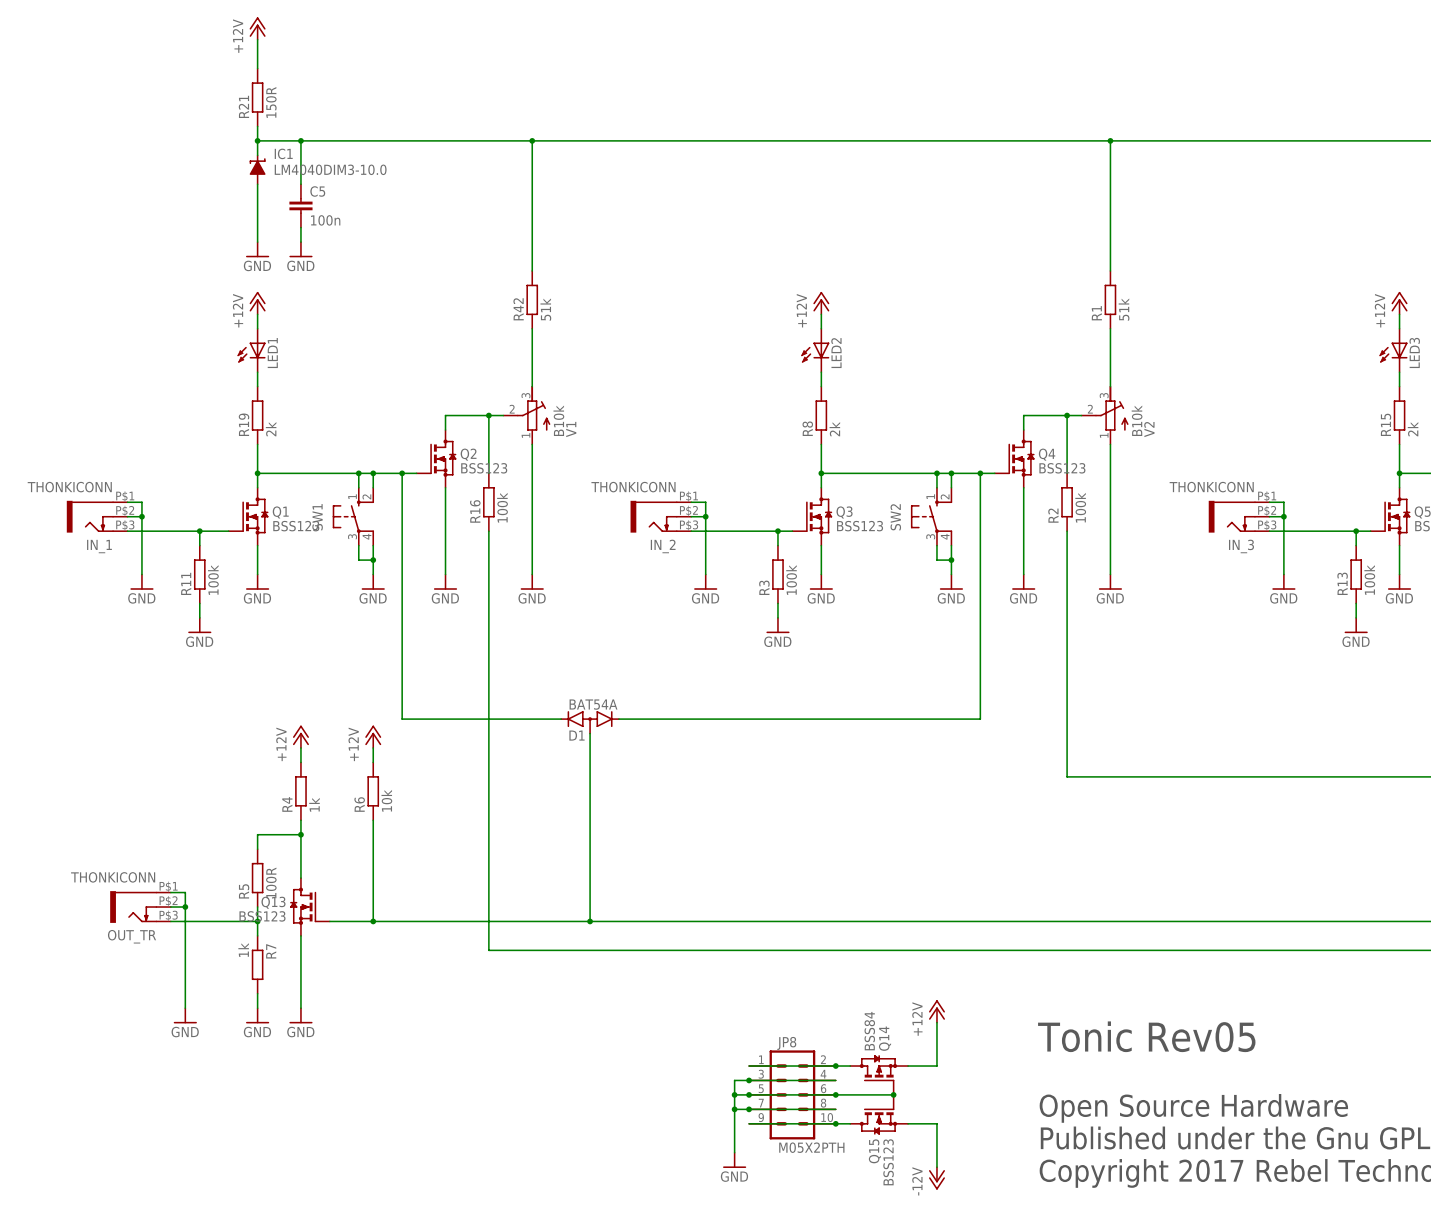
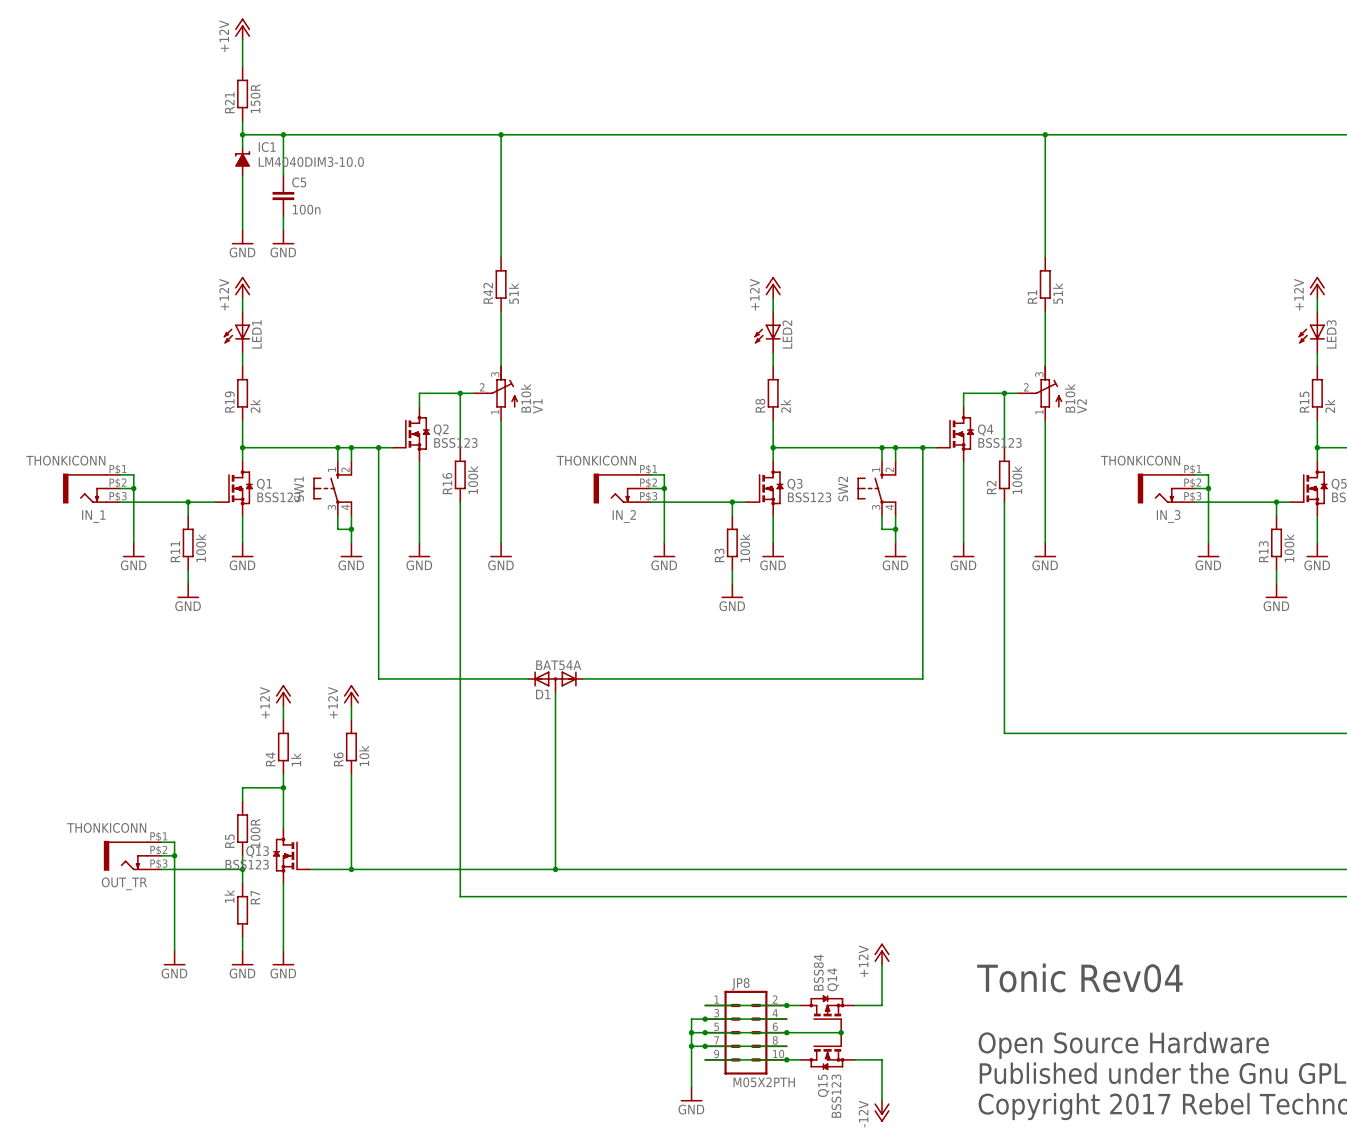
D1 symbol: [560, 711, 620, 734] -> [528, 671, 583, 693]
text: Tonic Rev05 (1146, 1036) -> Tonic Rev04 (1079, 977)

